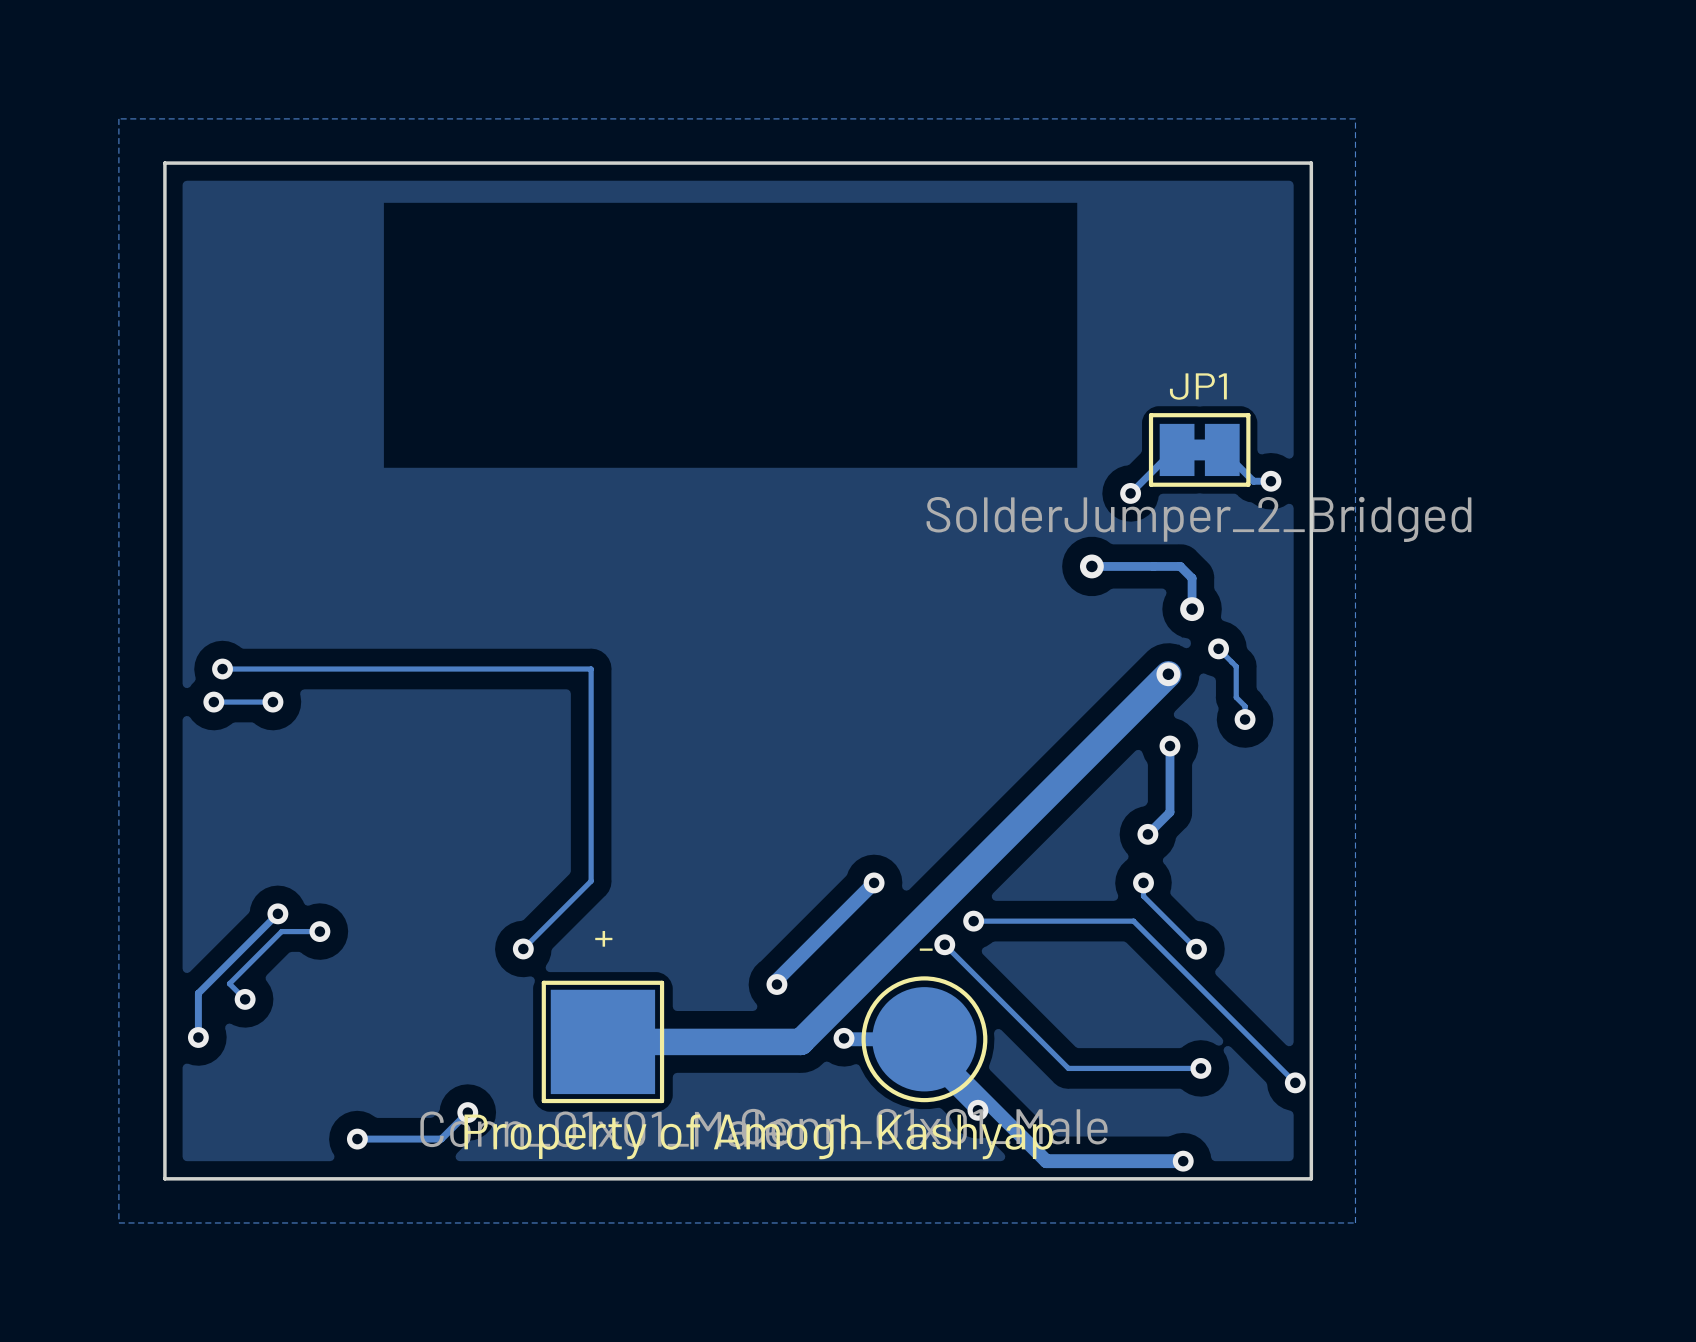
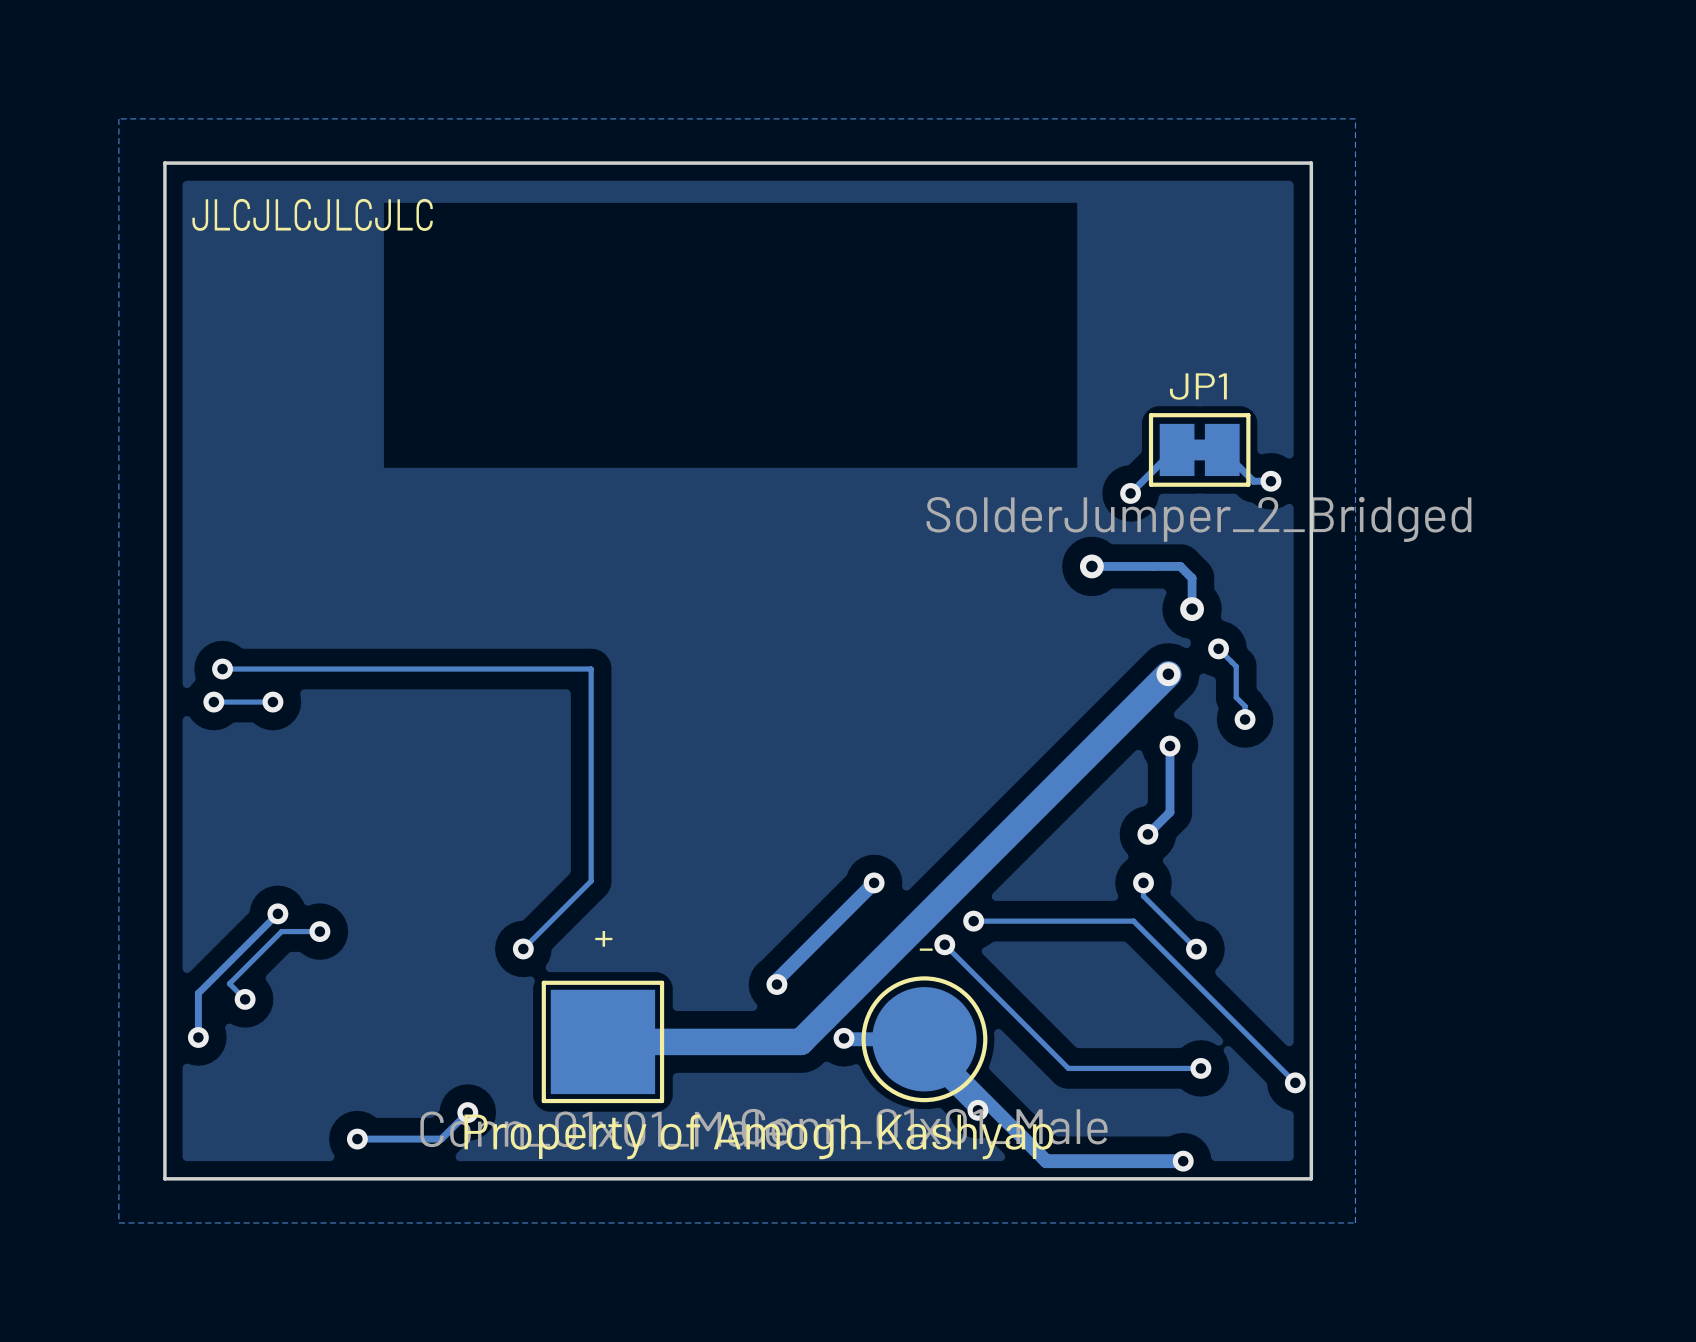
text: none -> JLCJLCJLCJLC (312, 214)

